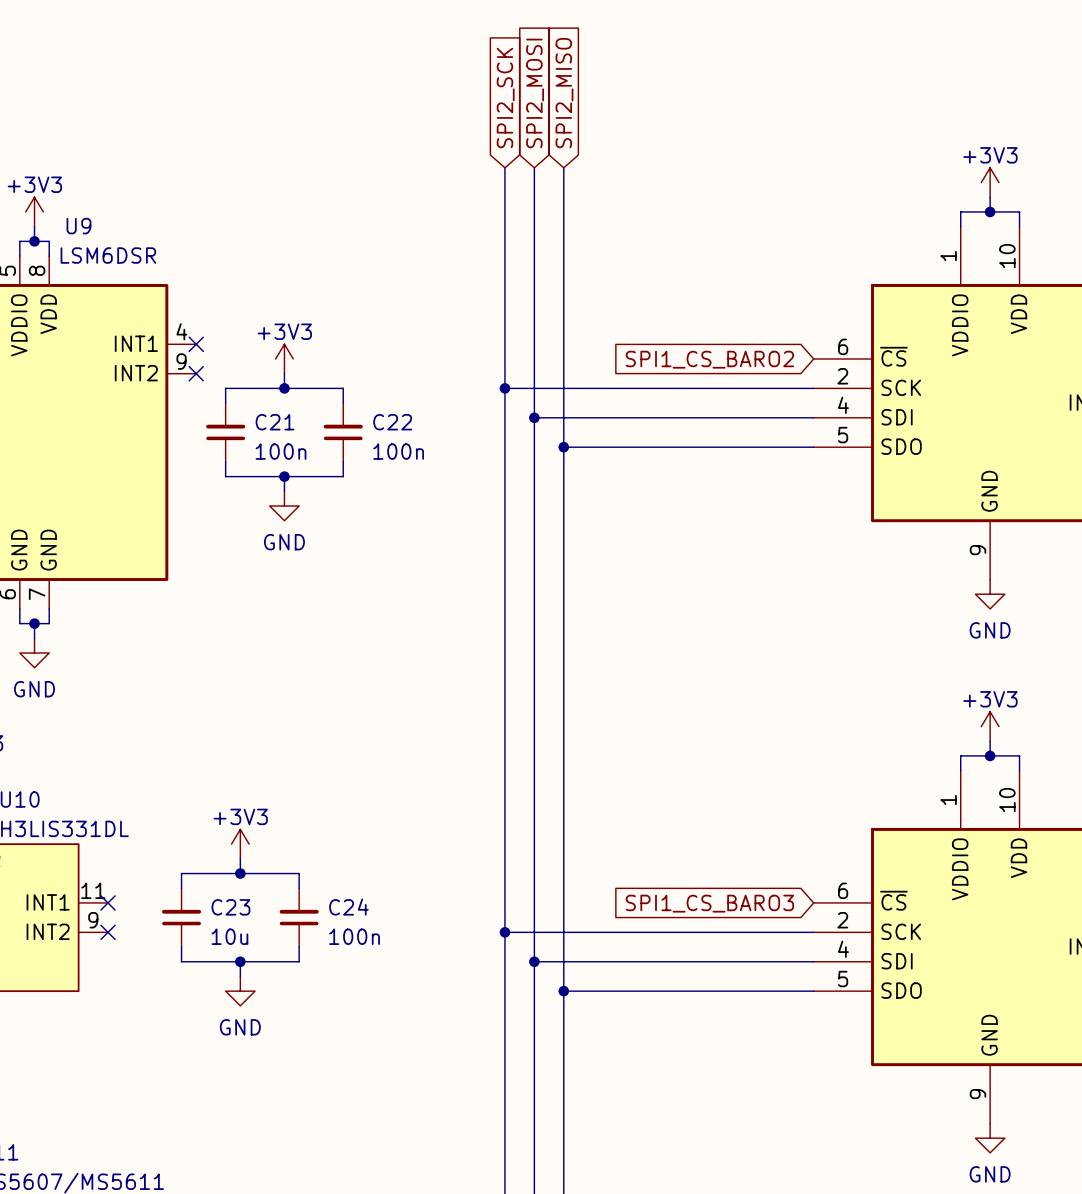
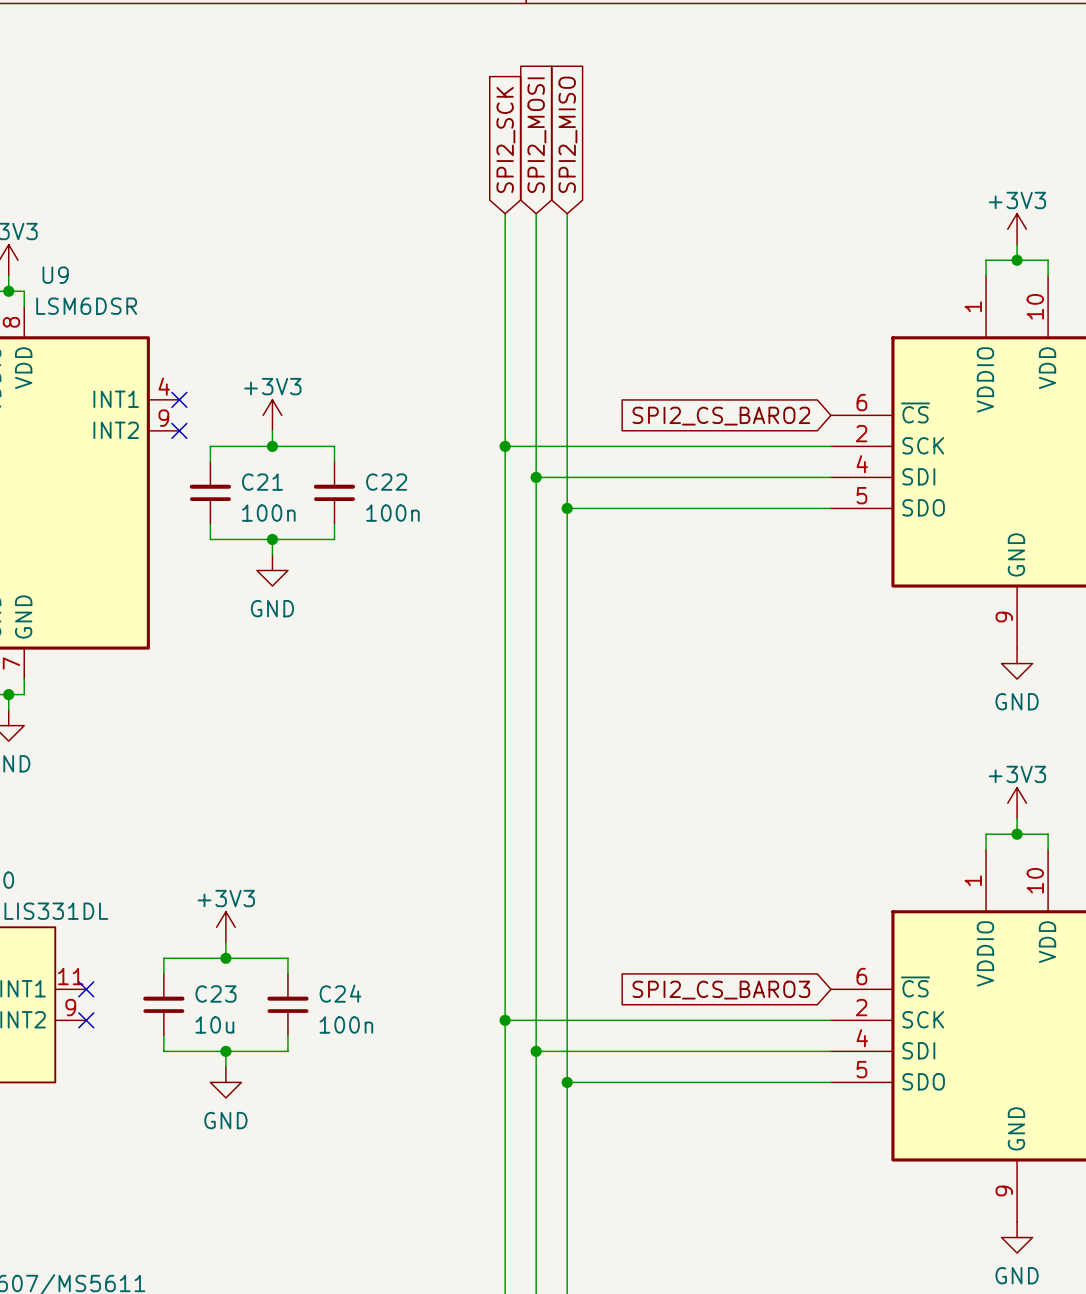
global label: SPI1_CS_BARO2 (709, 359) -> SPI2_CS_BARO2 (721, 416)
global label: SPI1_CS_BARO3 (709, 903) -> SPI2_CS_BARO3 (721, 990)

